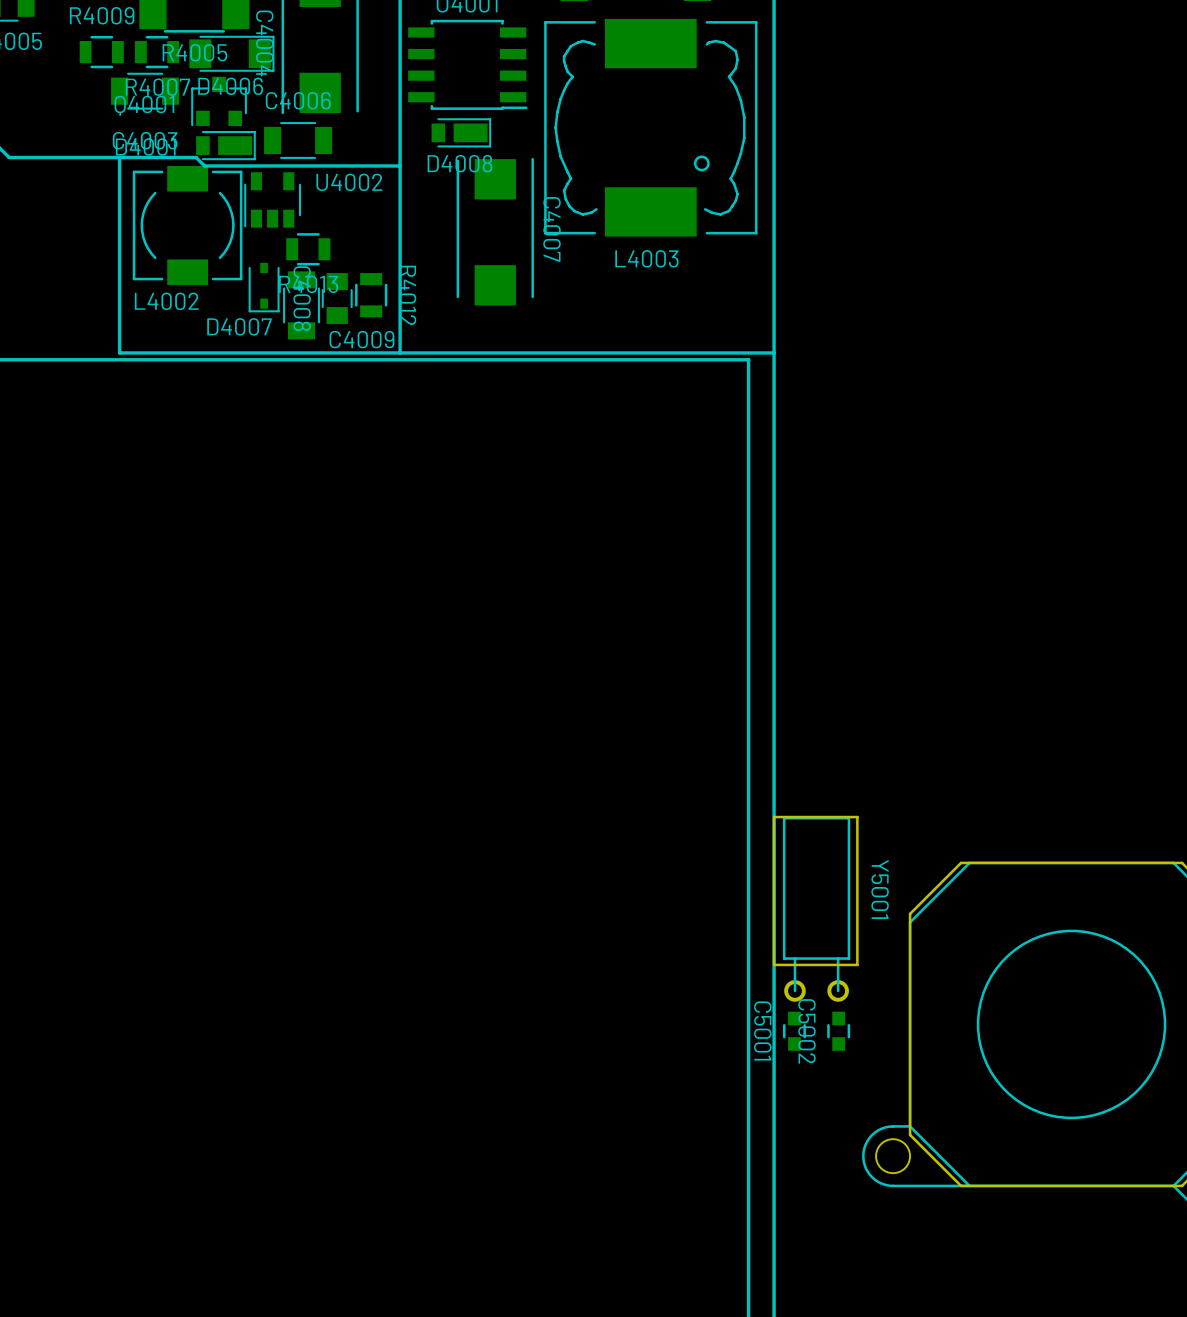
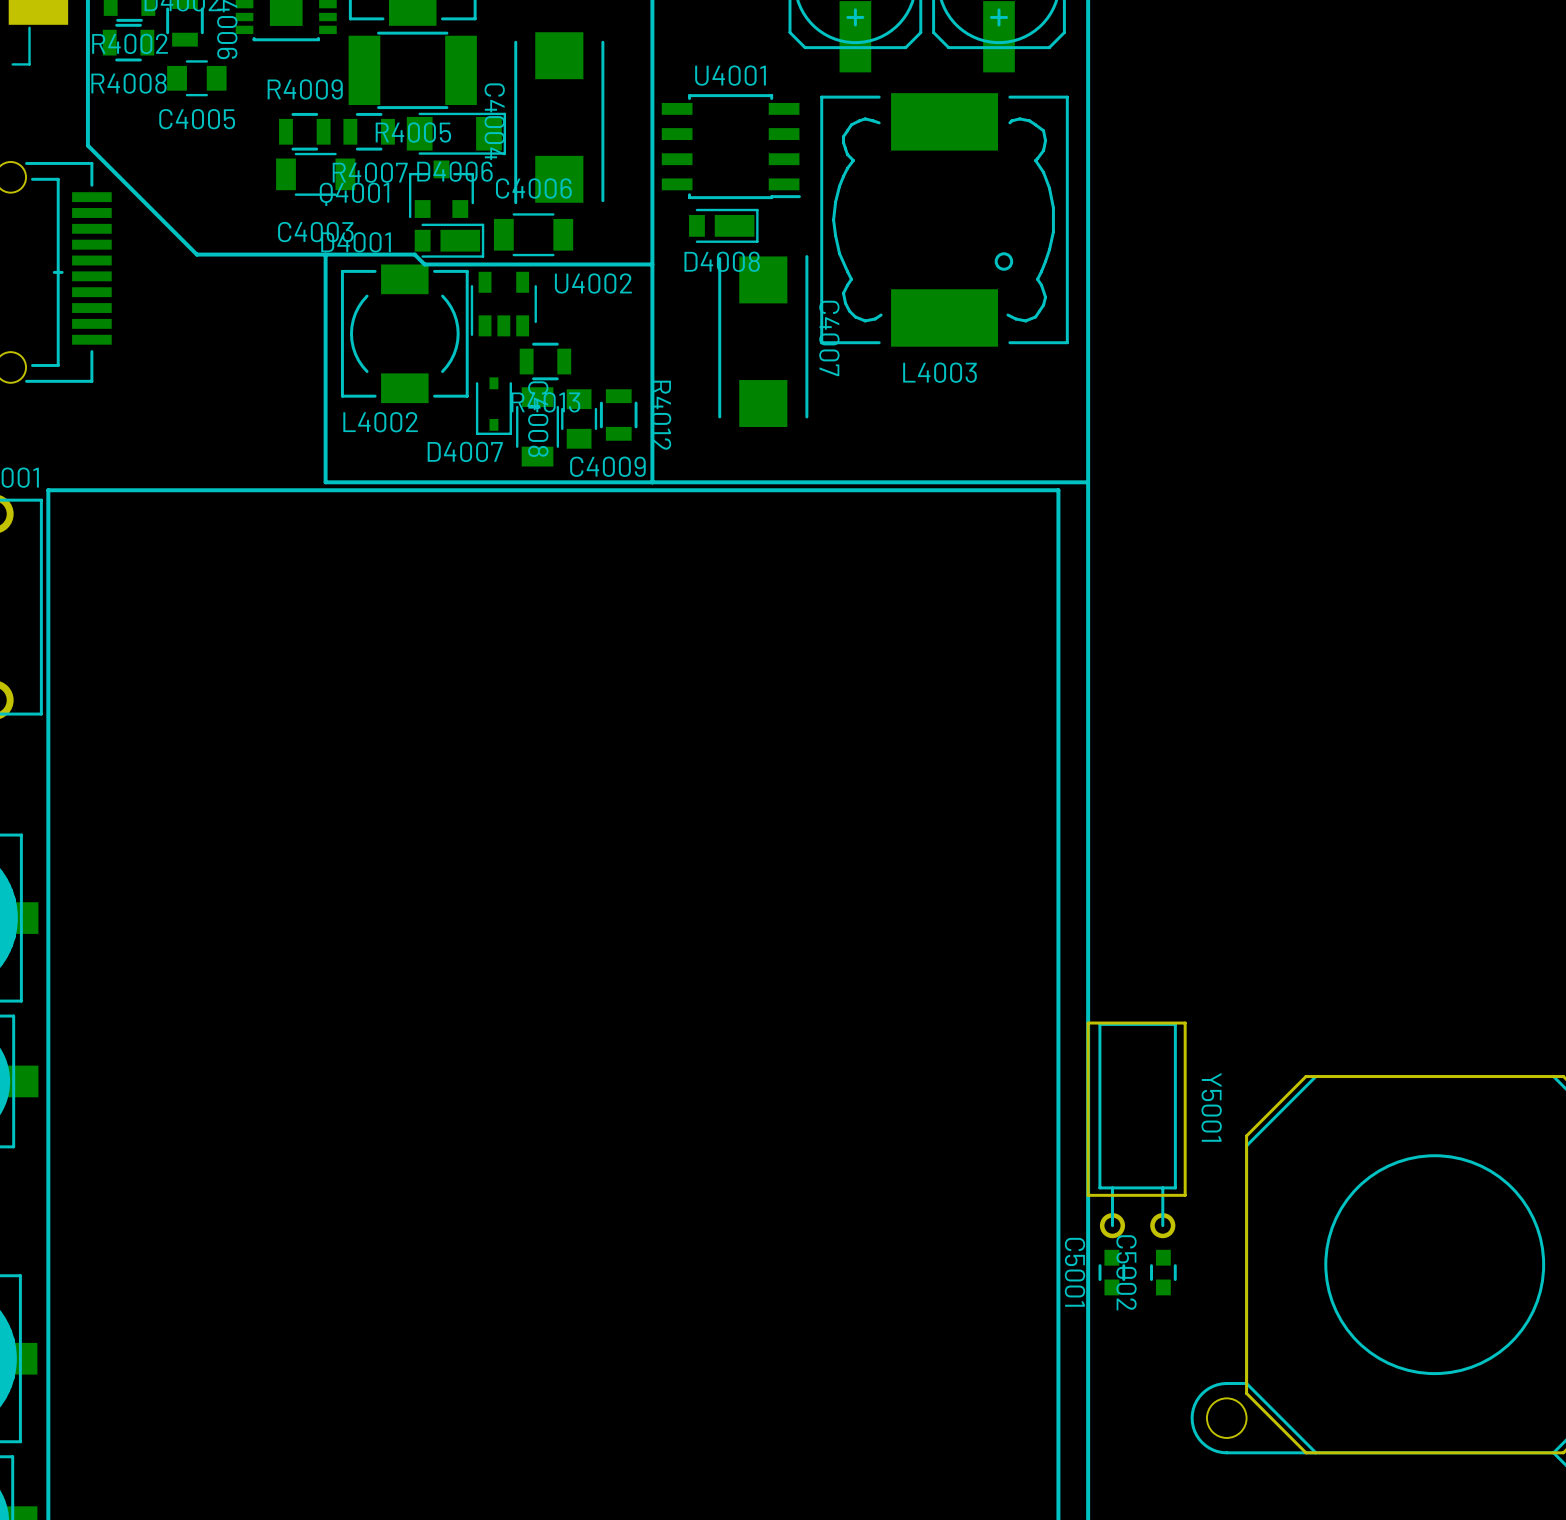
C4003 position: (145, 91) -> (315, 174)

